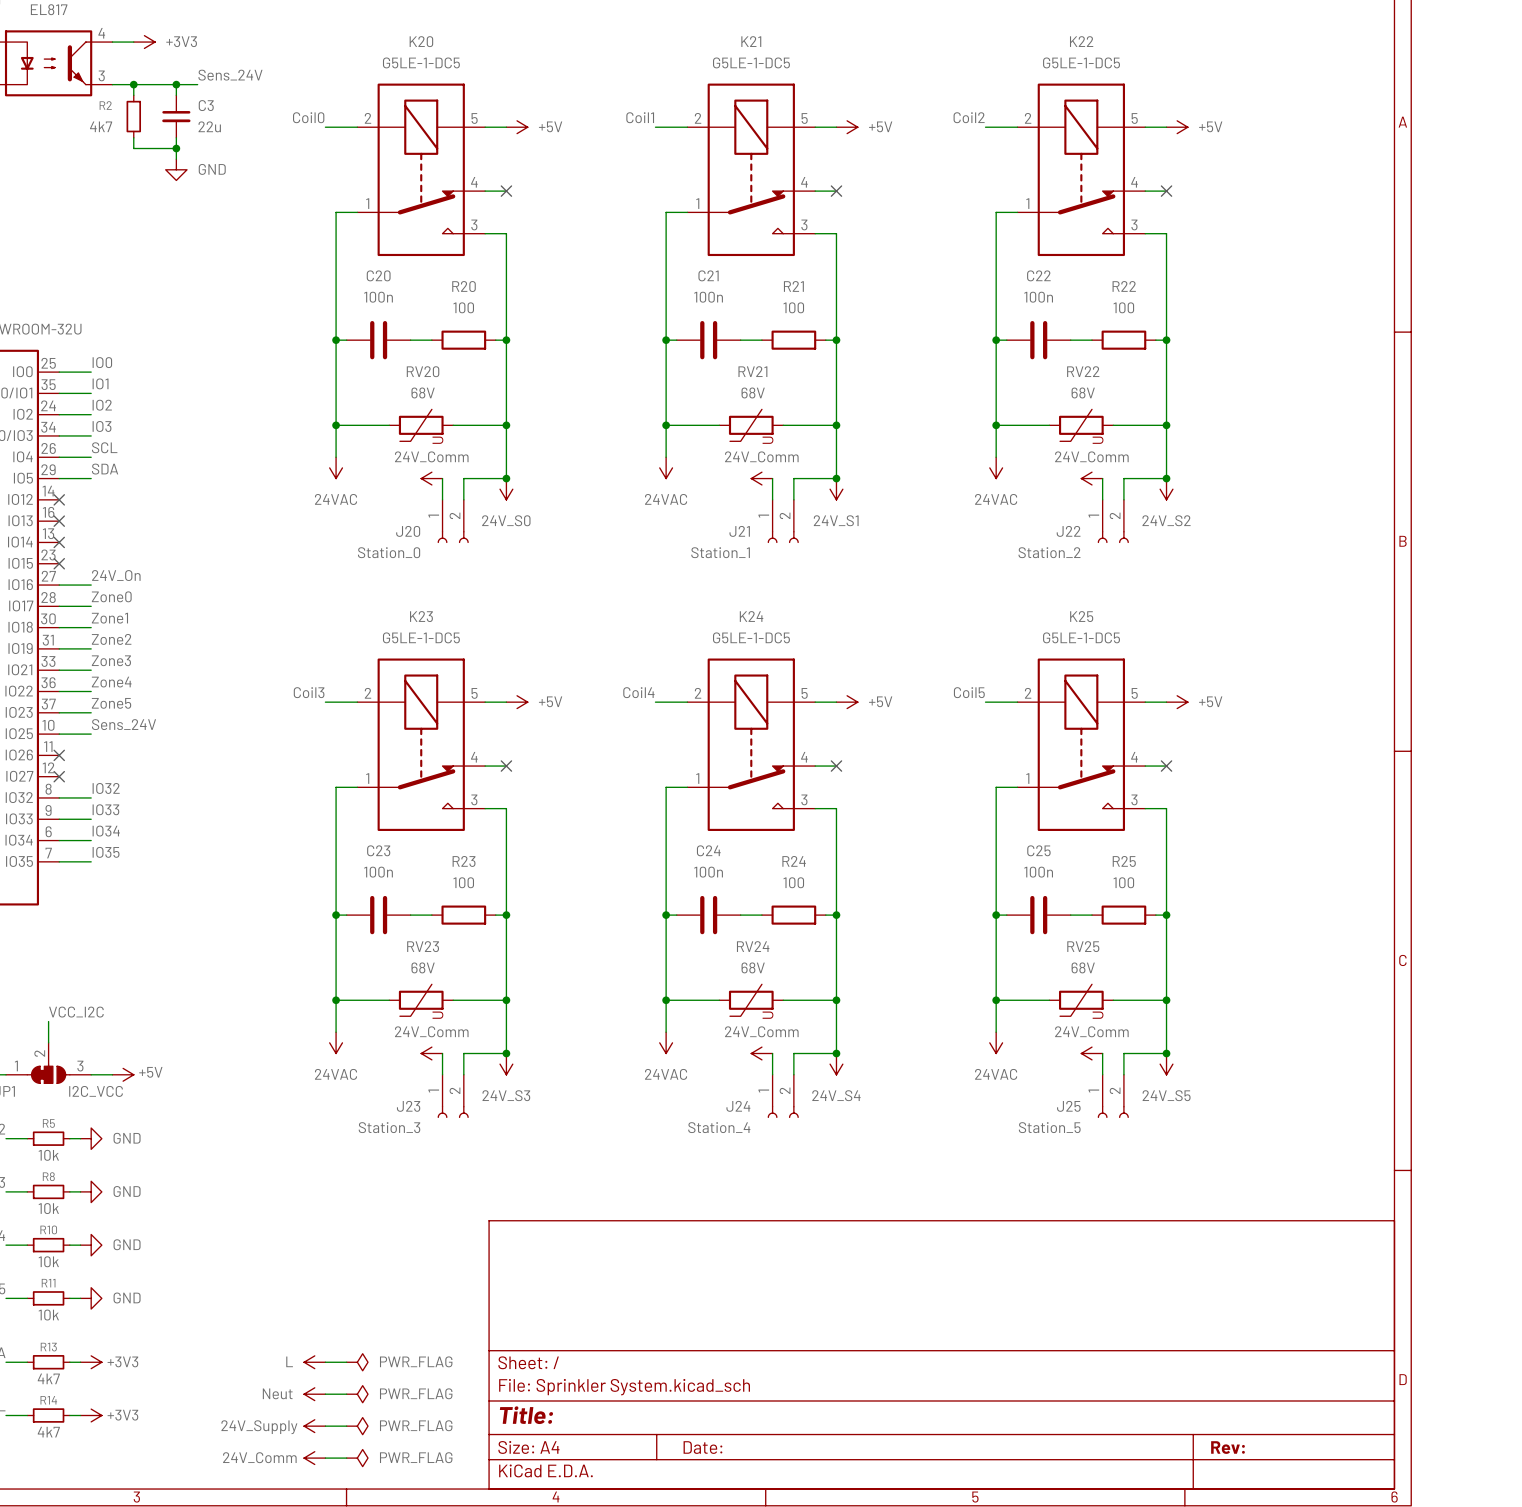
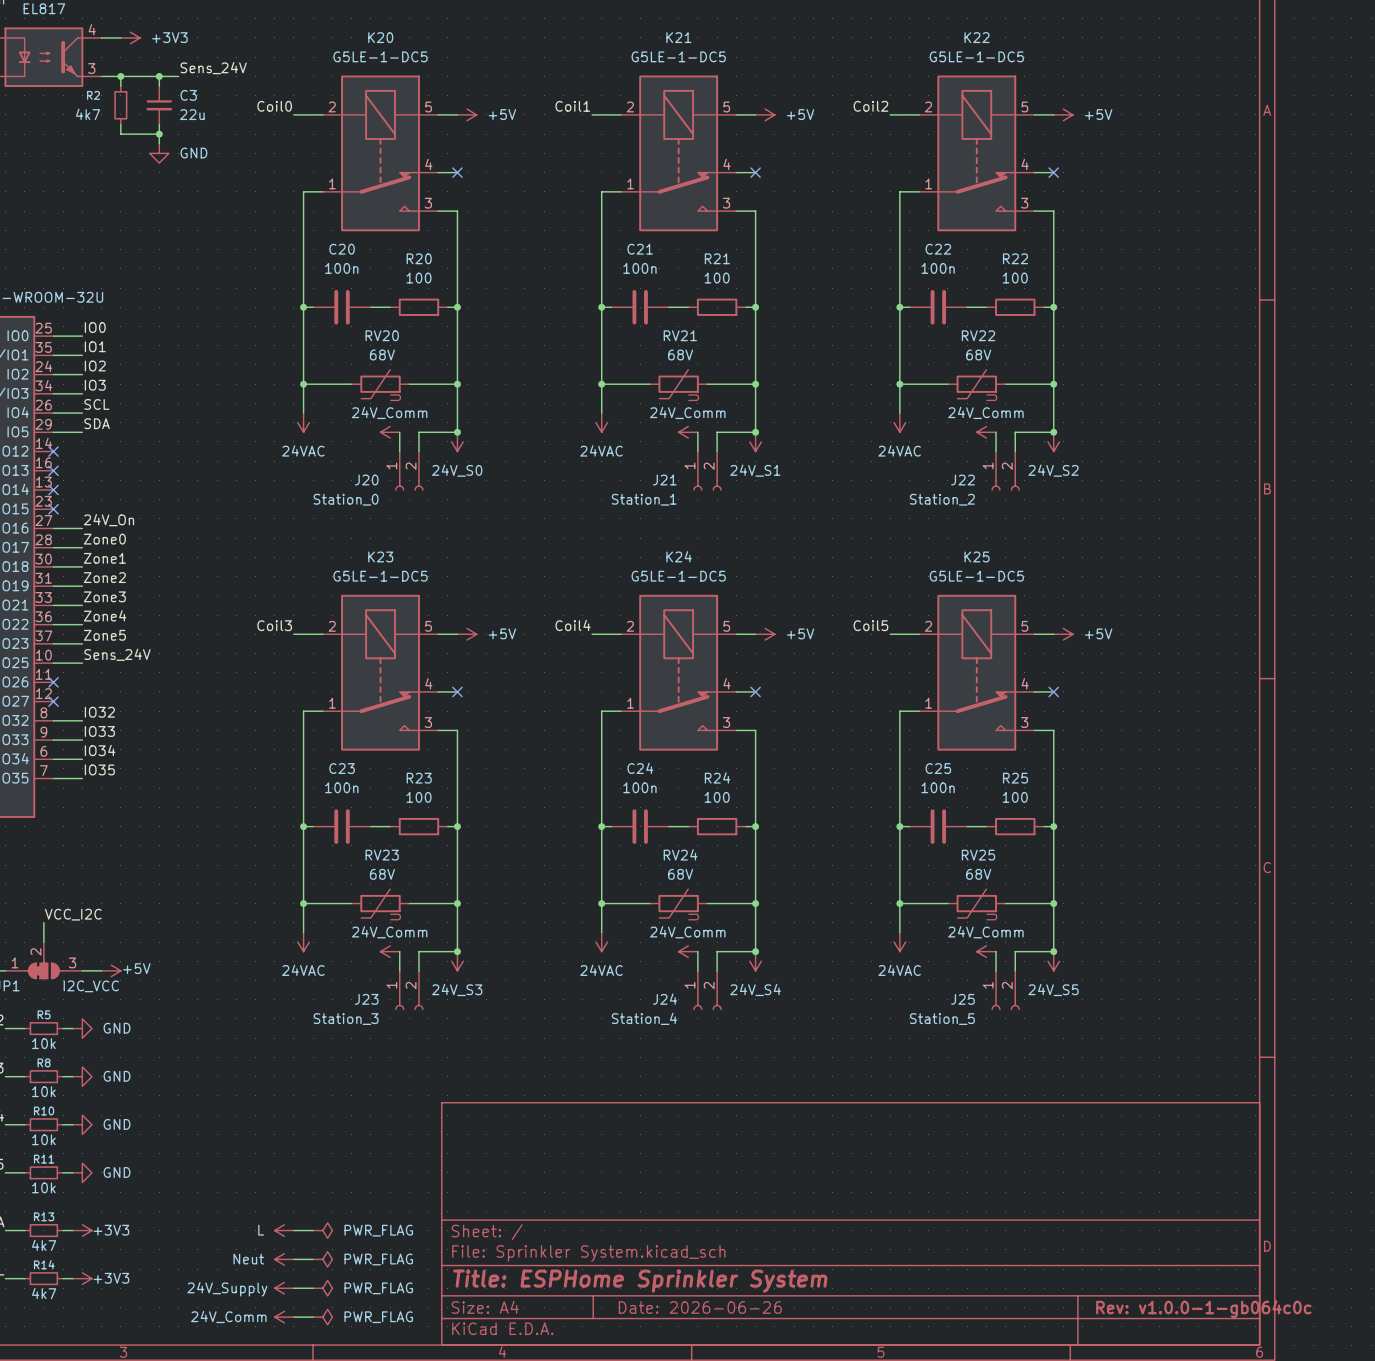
title block: Title: (526, 1415) -> Title: ESPHome Sprinkler System (640, 1281)
title block: Date: (702, 1447) -> Date: 2026-06-26 (700, 1307)
title block: Rev: (1227, 1447) -> Rev: v1.0.0-1-gb064c0c (1203, 1309)

